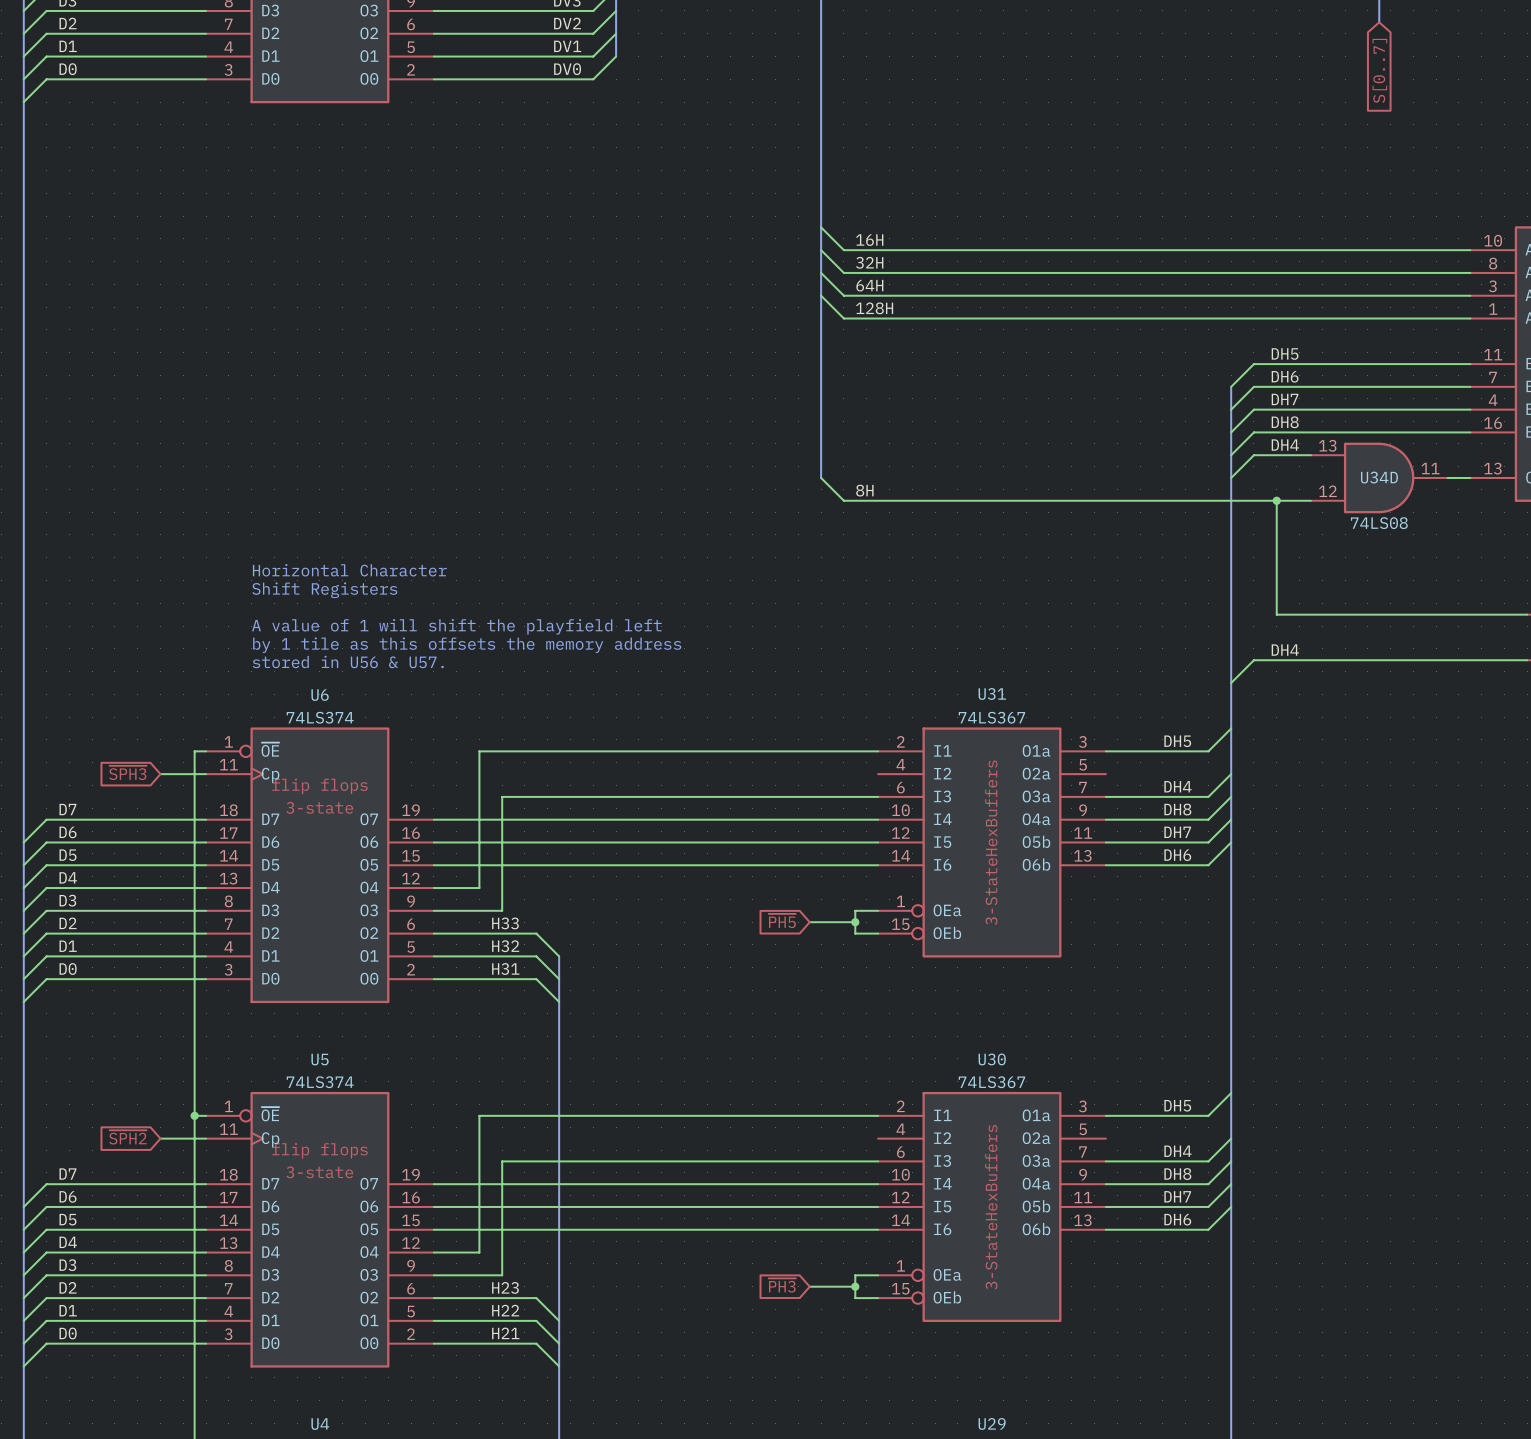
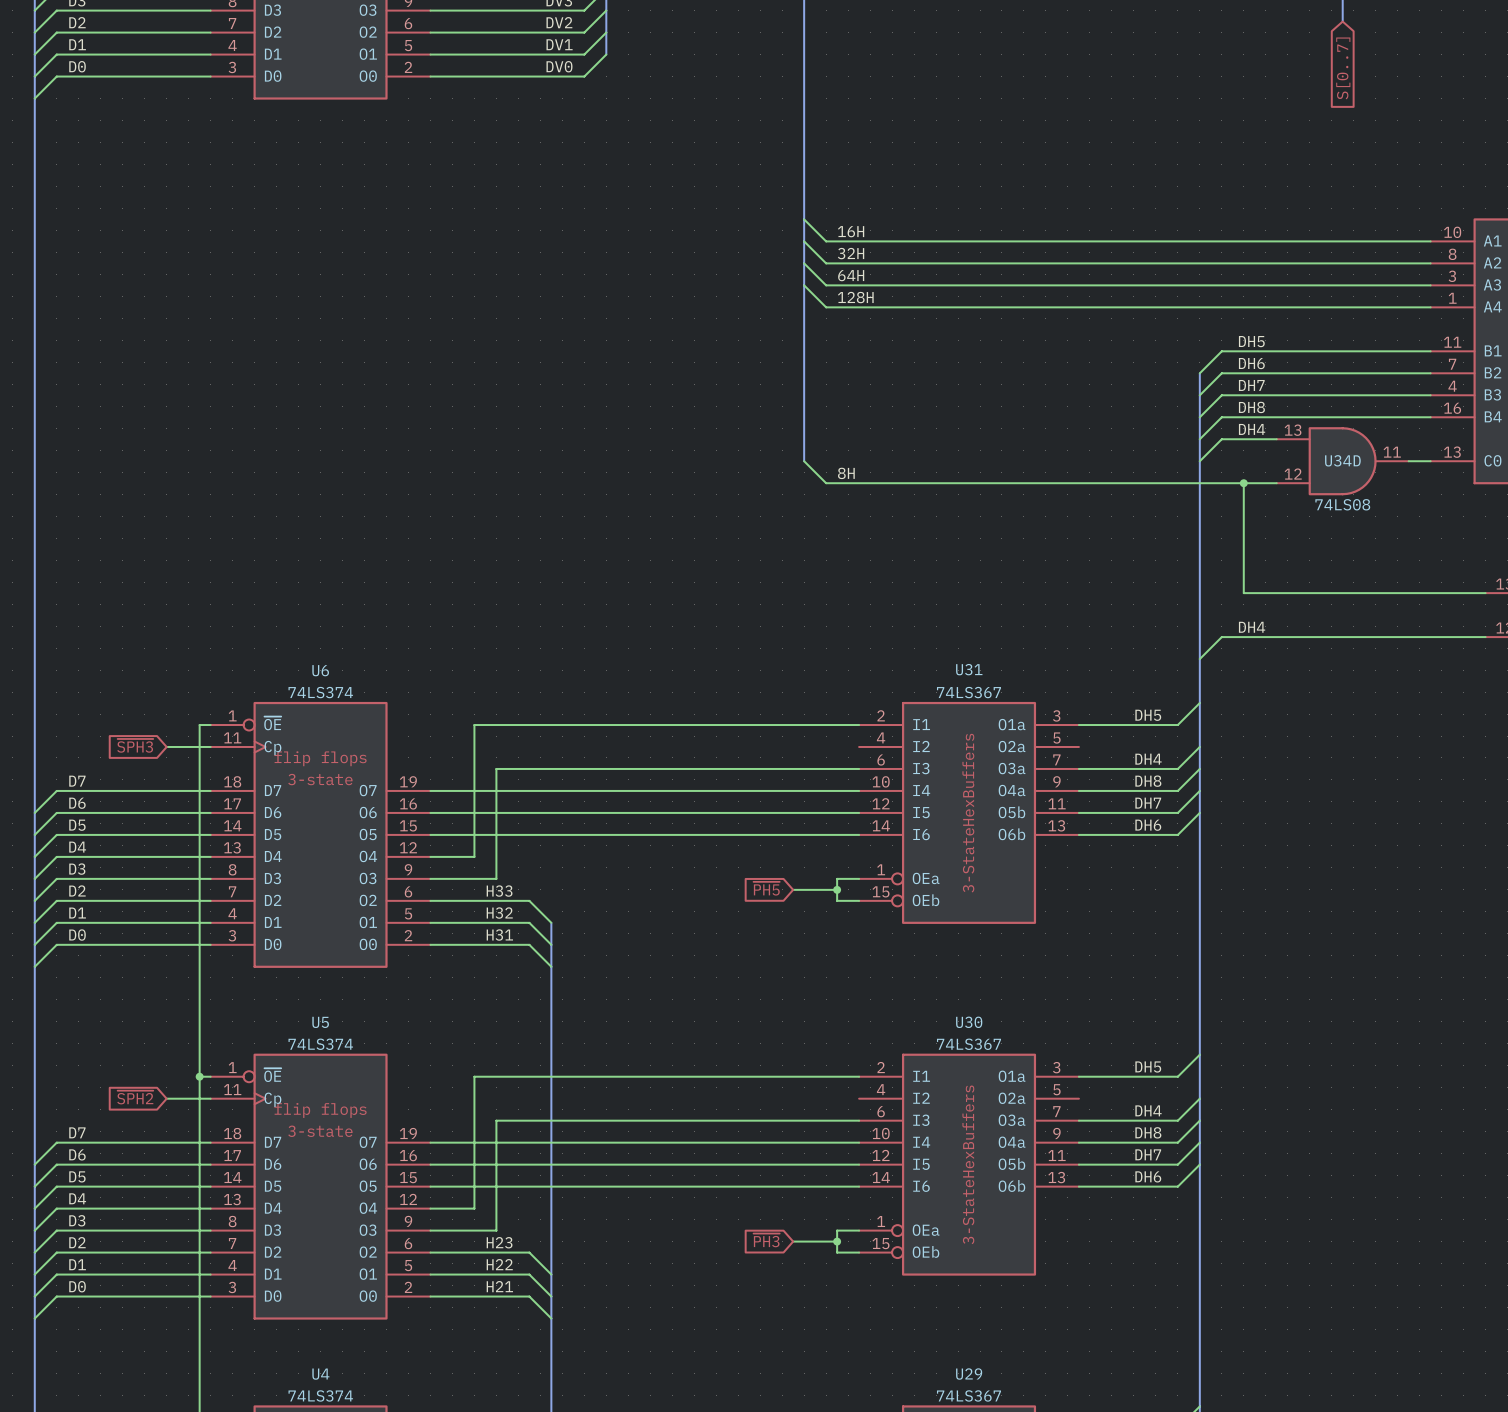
text: Horizontal Character (349, 570) -> none
text: Shift Registers (324, 590) -> none
text: A value of 1 will shift the playfield left (456, 626) -> none
text: by 1 tile as this offsets the memory address (467, 645) -> none
text: stored in U56 & U57. (348, 661) -> none

